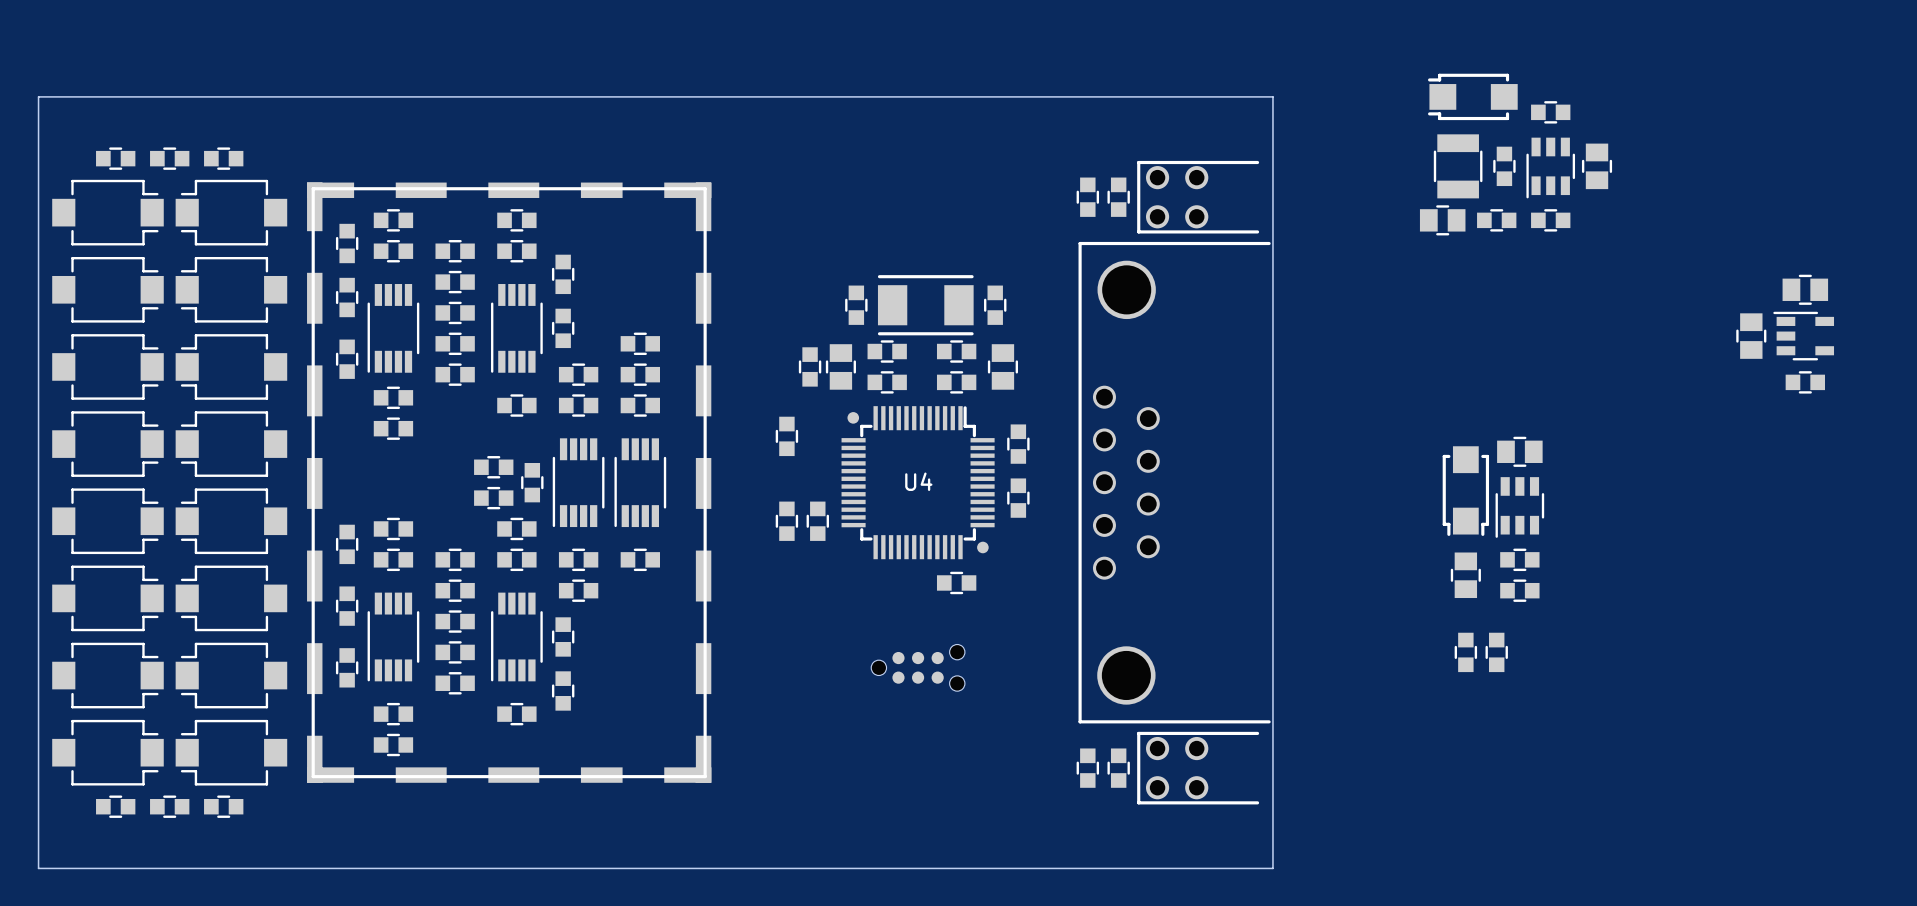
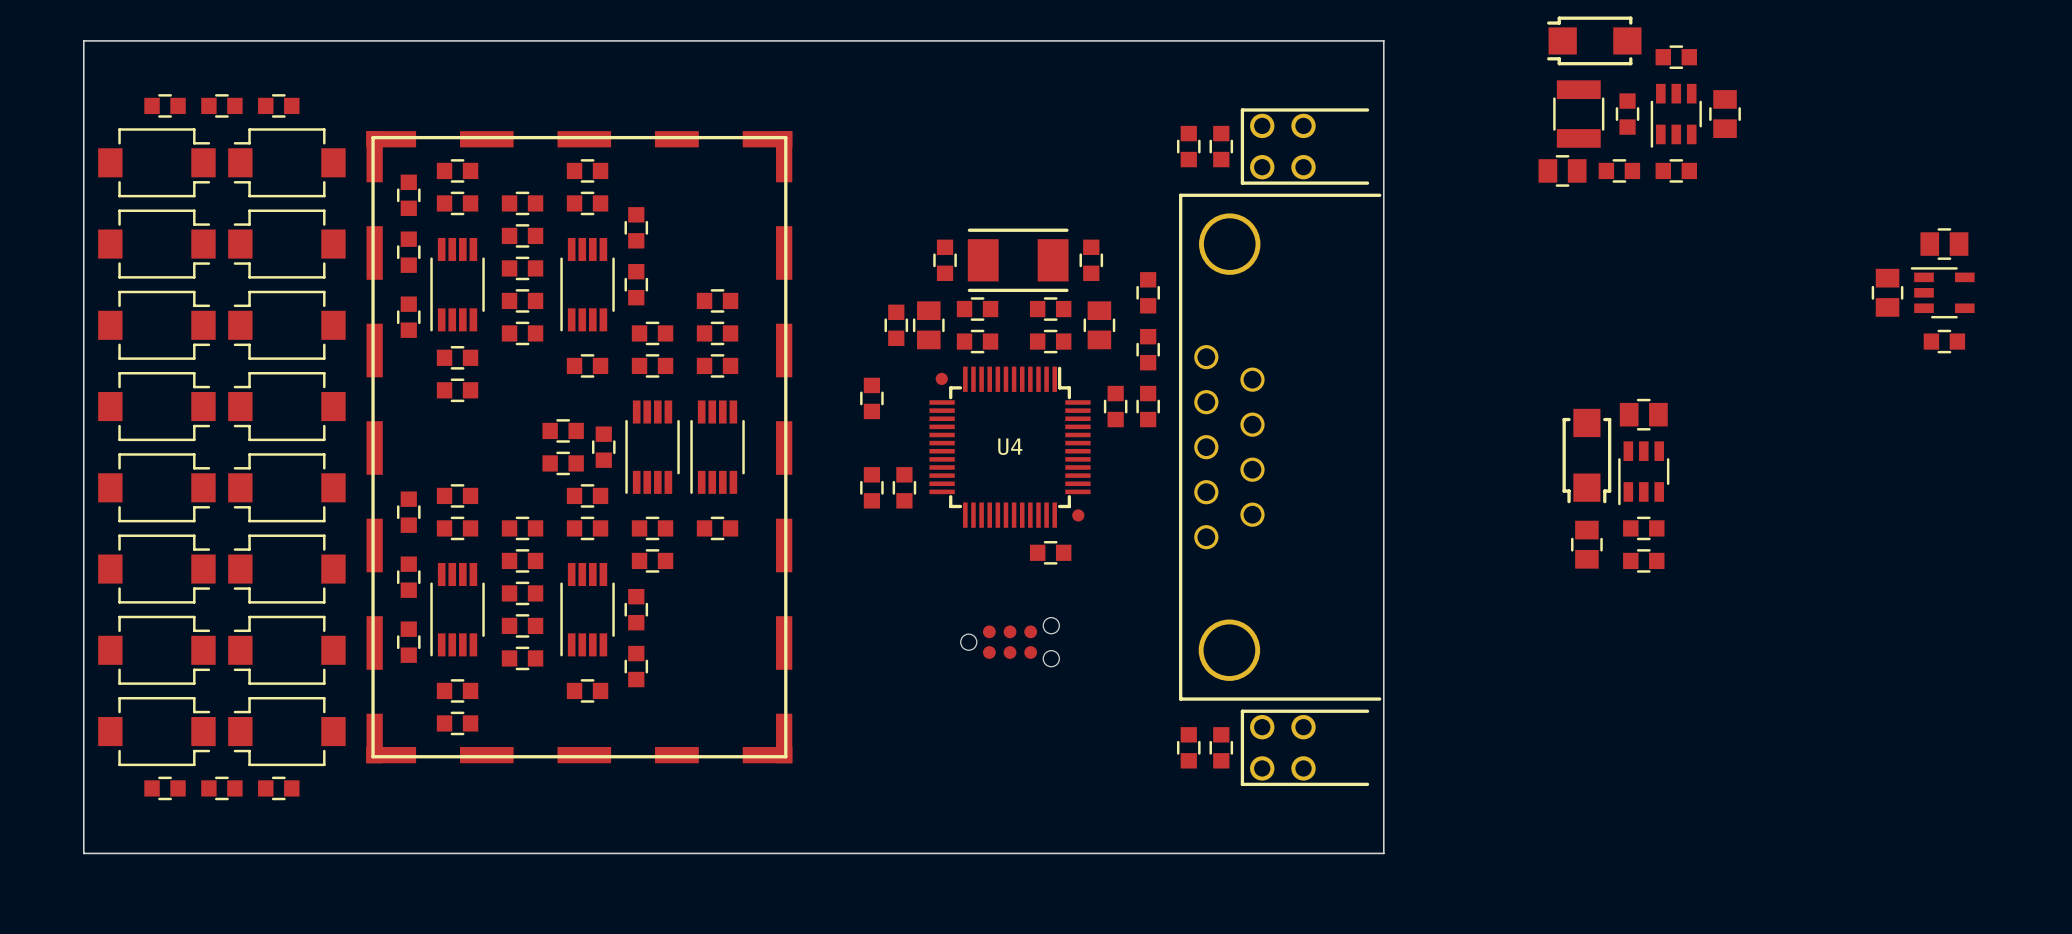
part: none -> (1148, 292)
part: none -> (1148, 349)
part: none -> (1148, 406)
part: (1018, 498) -> none
part: (1465, 652) -> none
part: (1496, 652) -> none

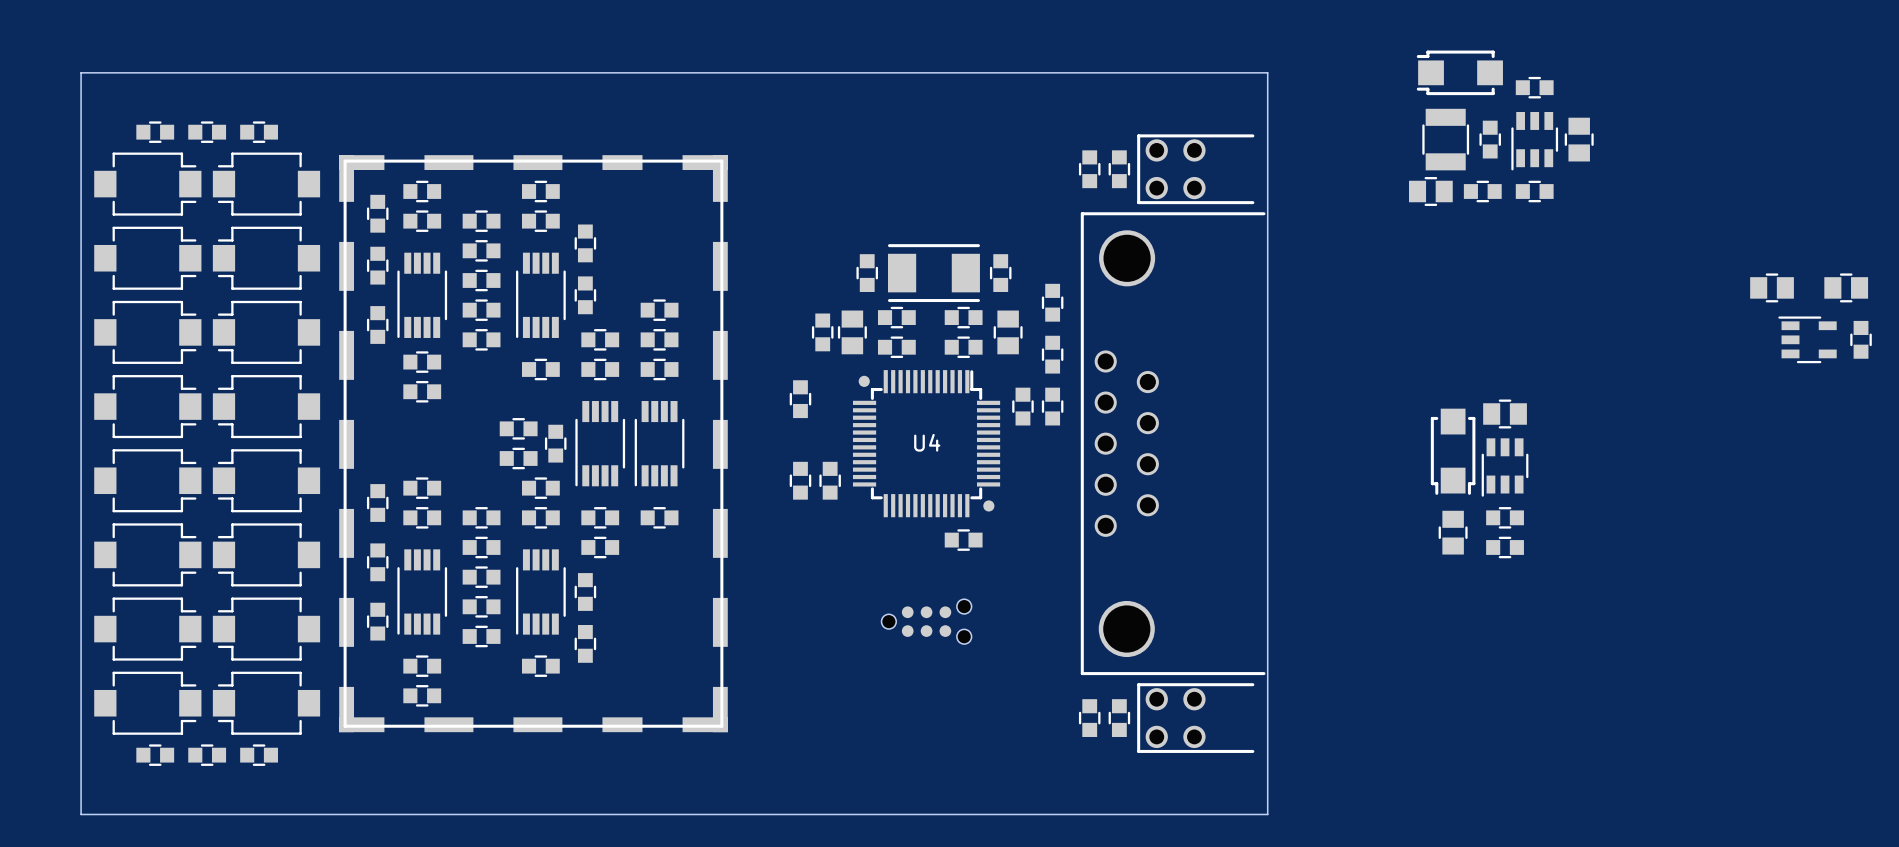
part: (1944, 244) -> none
part: none -> (1772, 287)
part: none -> (1846, 287)
part: (1887, 292) -> none
part position: (1942, 292) -> (1807, 339)
part rotation: 0° (1944, 341) -> 90° clockwise (1861, 339)
part position: (1944, 341) -> (1861, 339)

